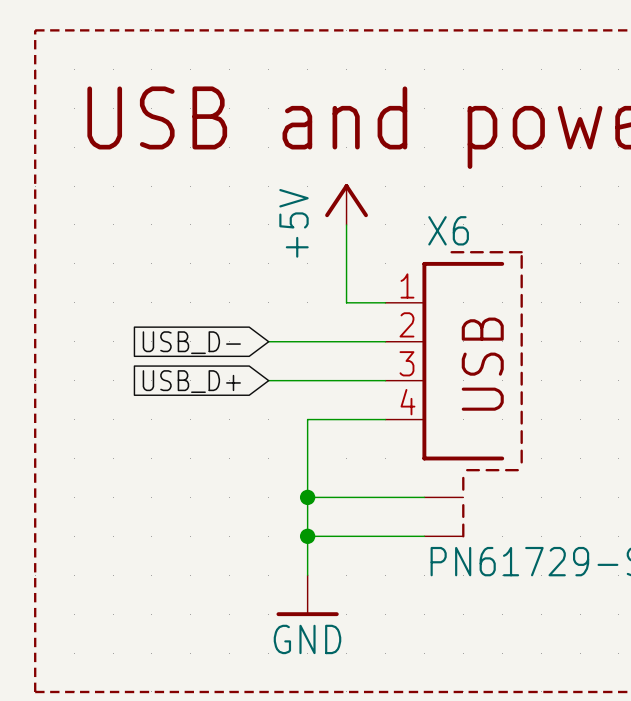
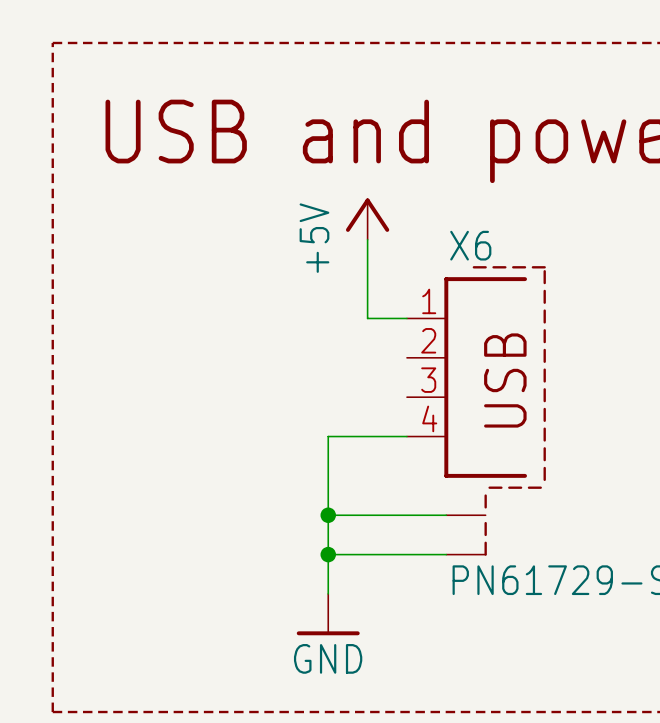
wire: (268, 341) (385, 341) -> none
global label: USB_D- (191, 342) -> none
wire: (268, 380) (385, 380) -> none
global label: USB_D+ (191, 381) -> none

